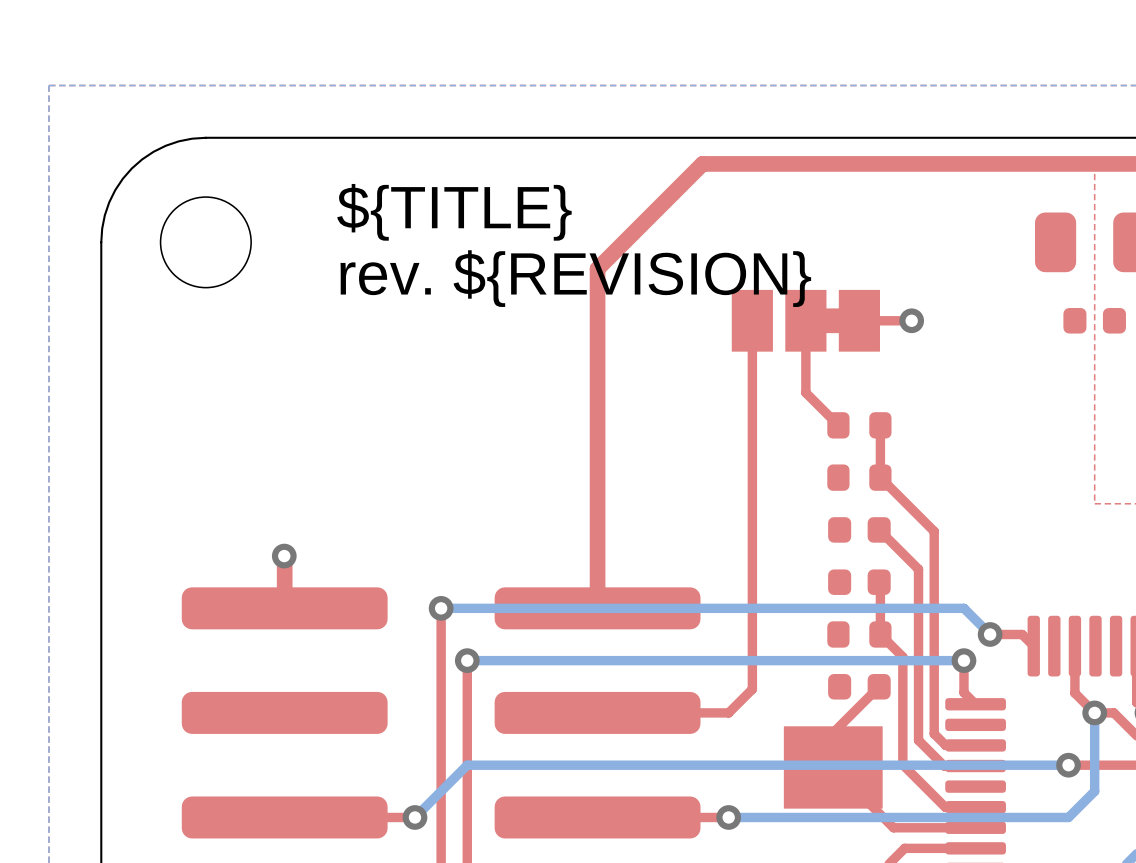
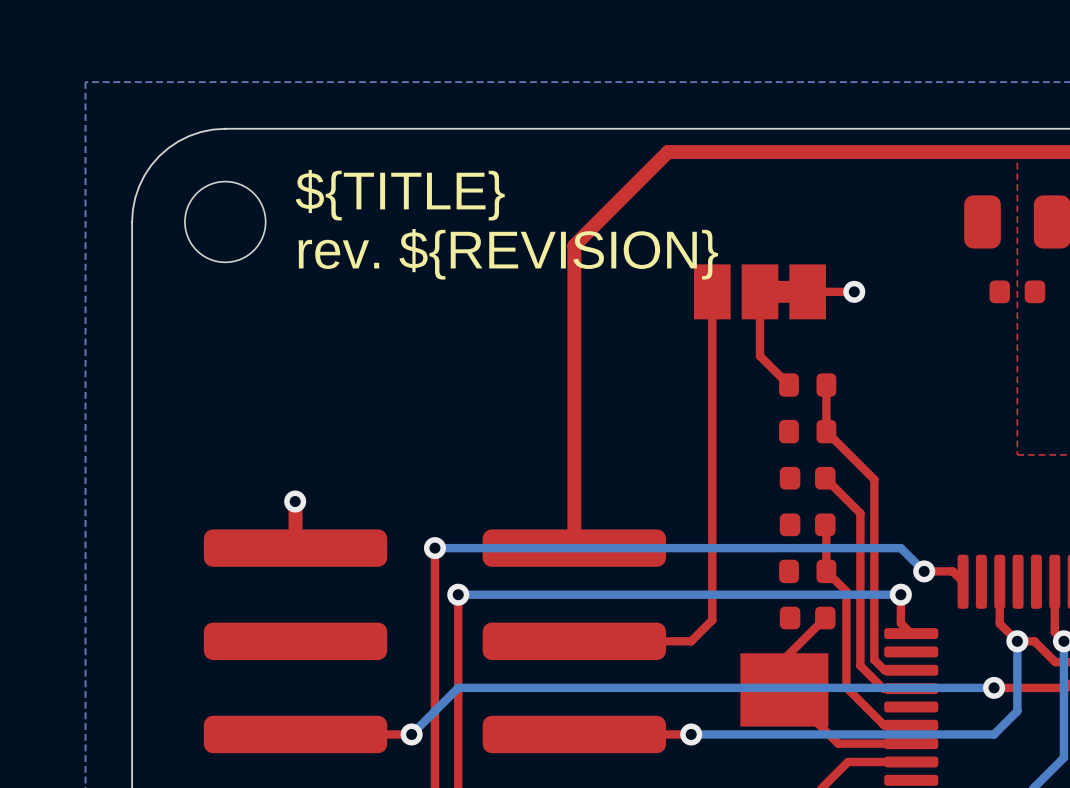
text position: ${TITLE} (454, 212) -> ${TITLE} (400, 195)
text position: rev. ${REVISION} (575, 278) -> rev. ${REVISION} (508, 254)

